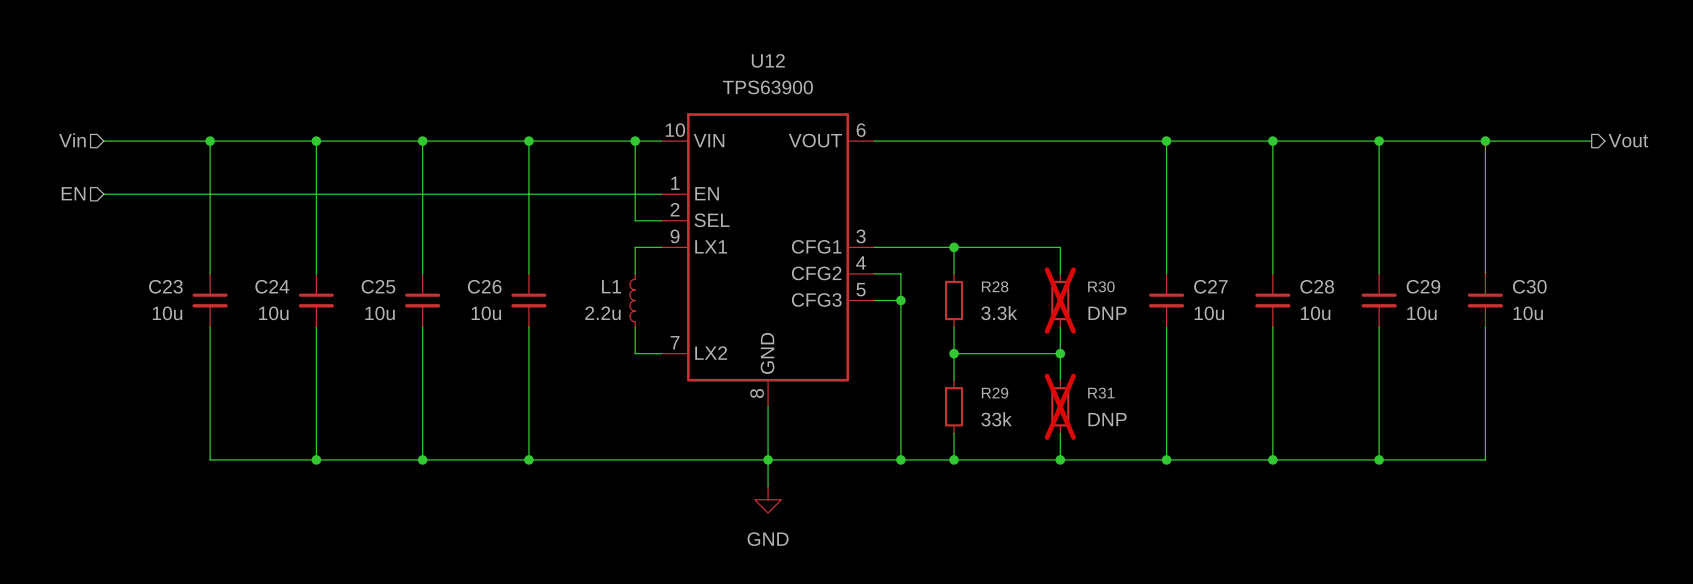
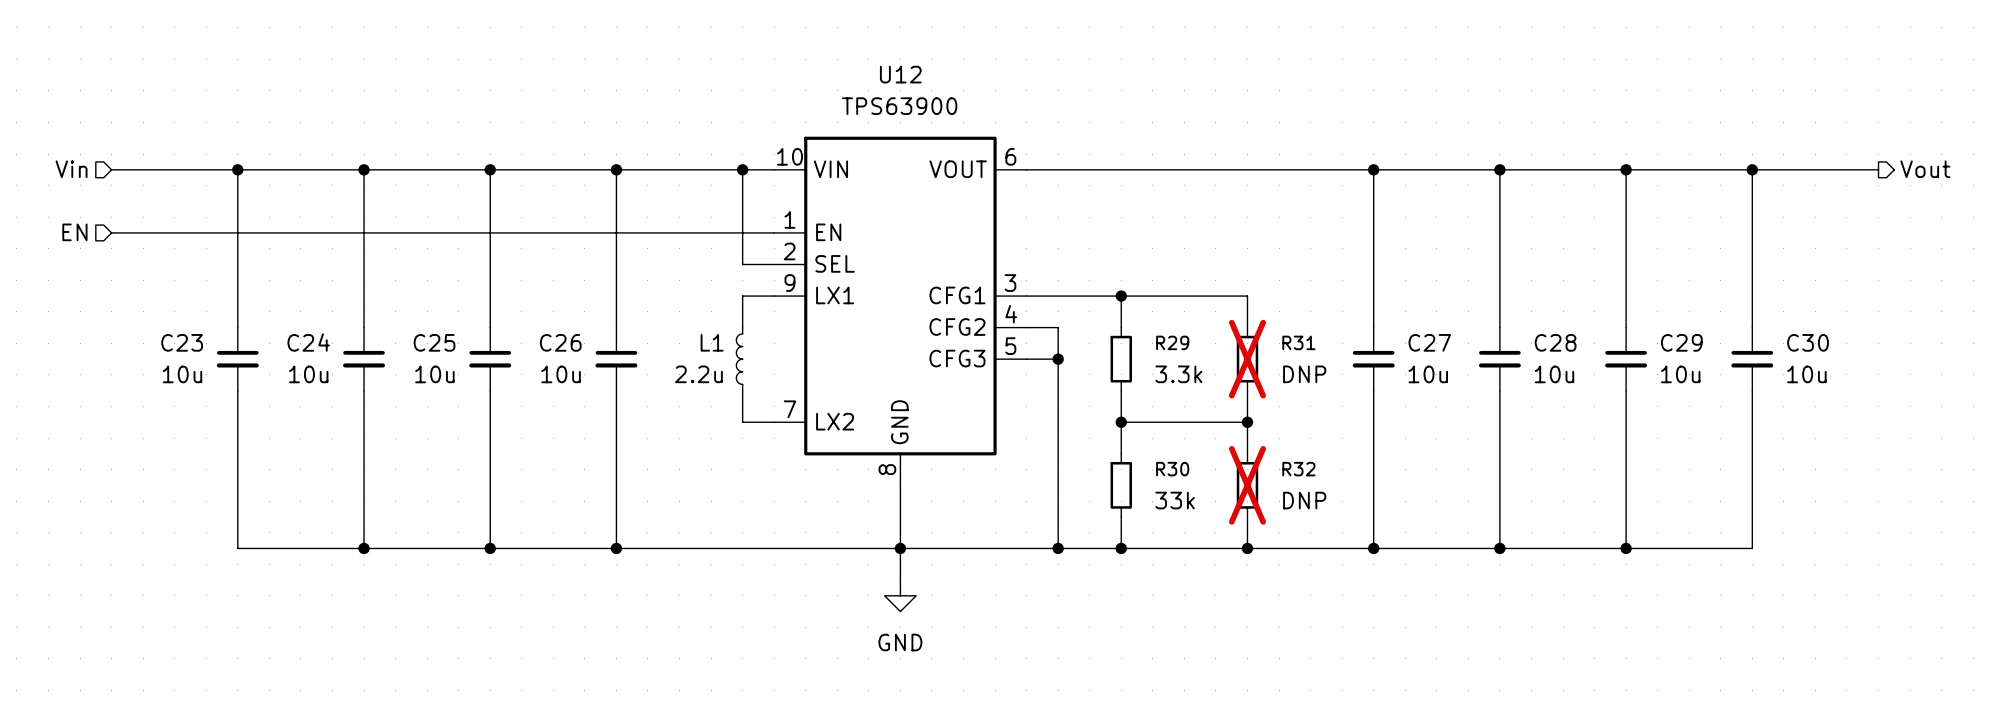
R28 name: R28 (995, 286) -> R29 (1172, 342)
R30 name: R30 (1101, 286) -> R31 (1298, 342)
R29 name: R29 (995, 393) -> R30 (1172, 469)
R31 name: R31 (1101, 393) -> R32 (1298, 469)

